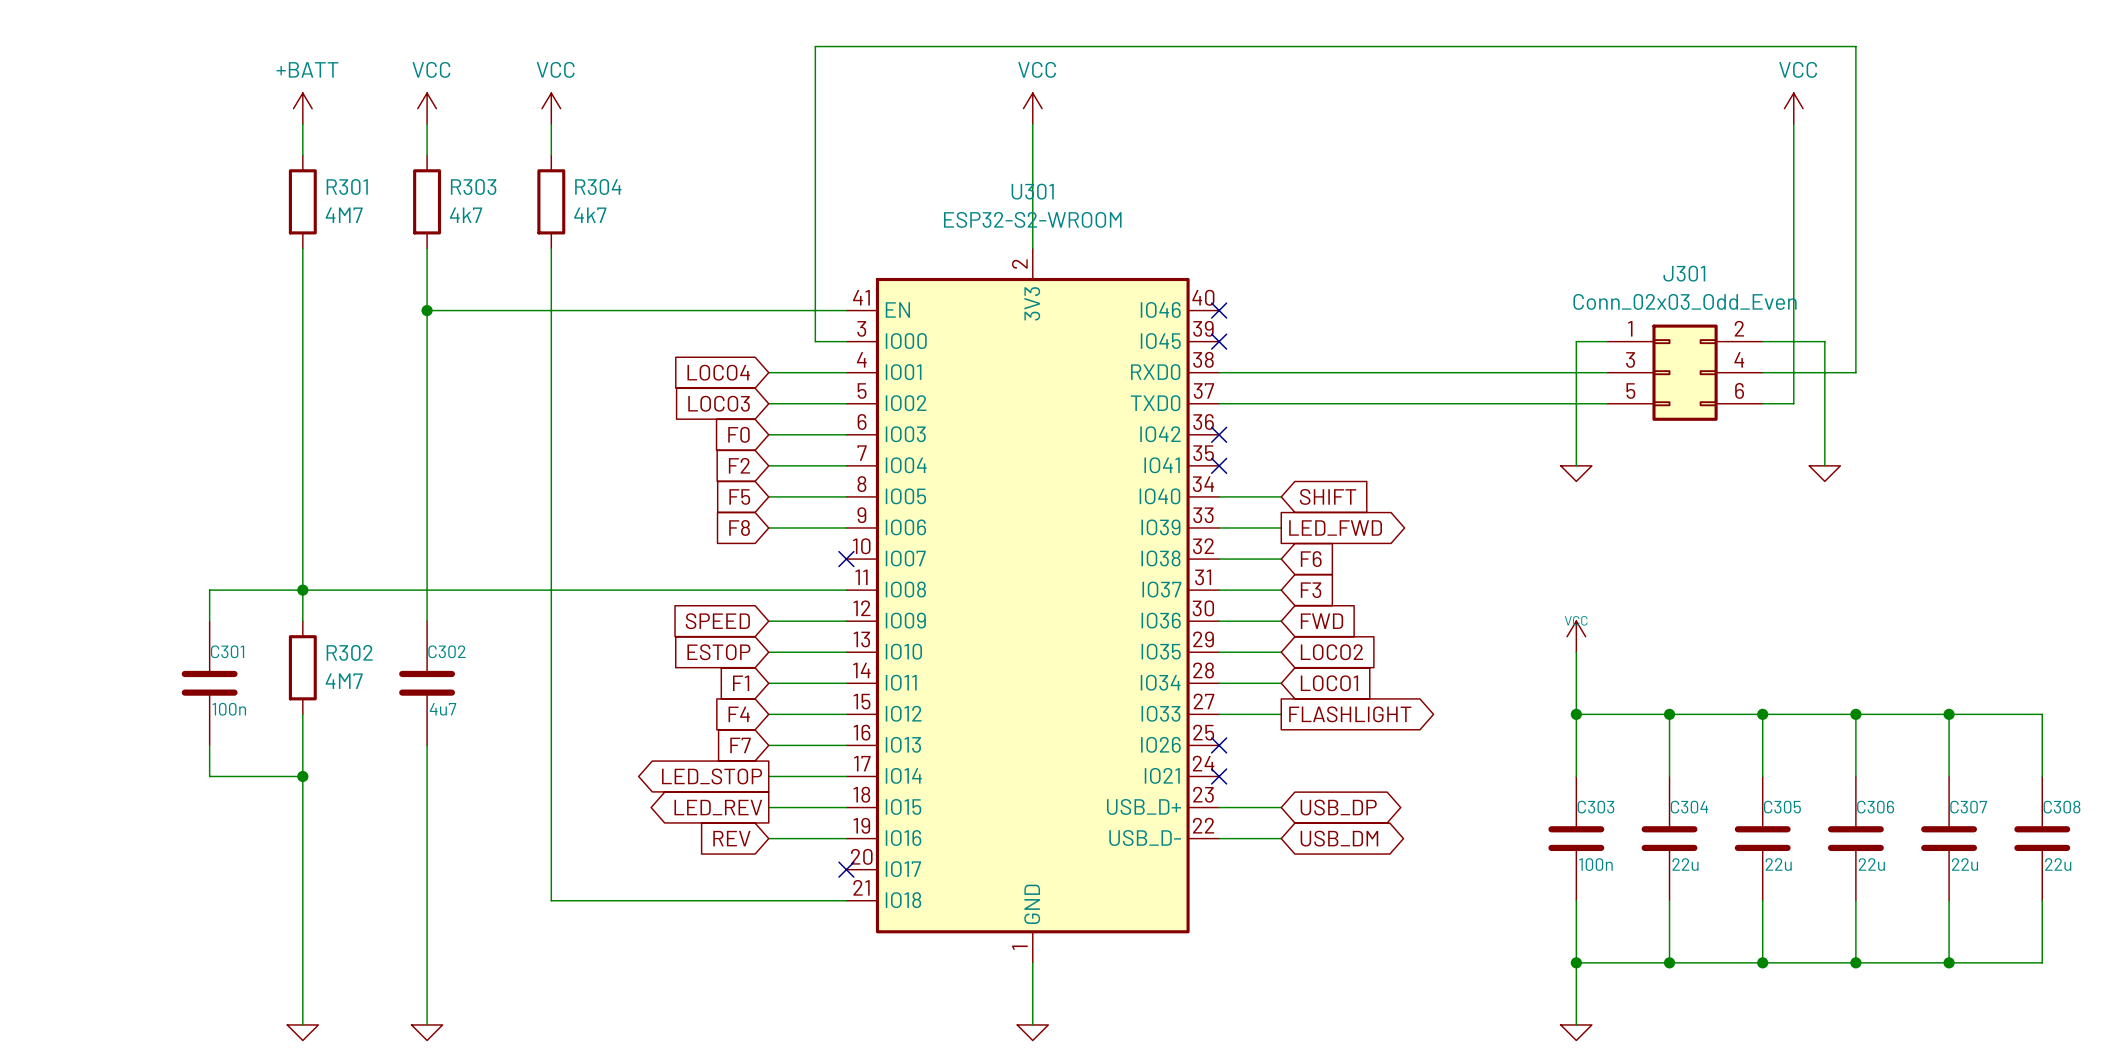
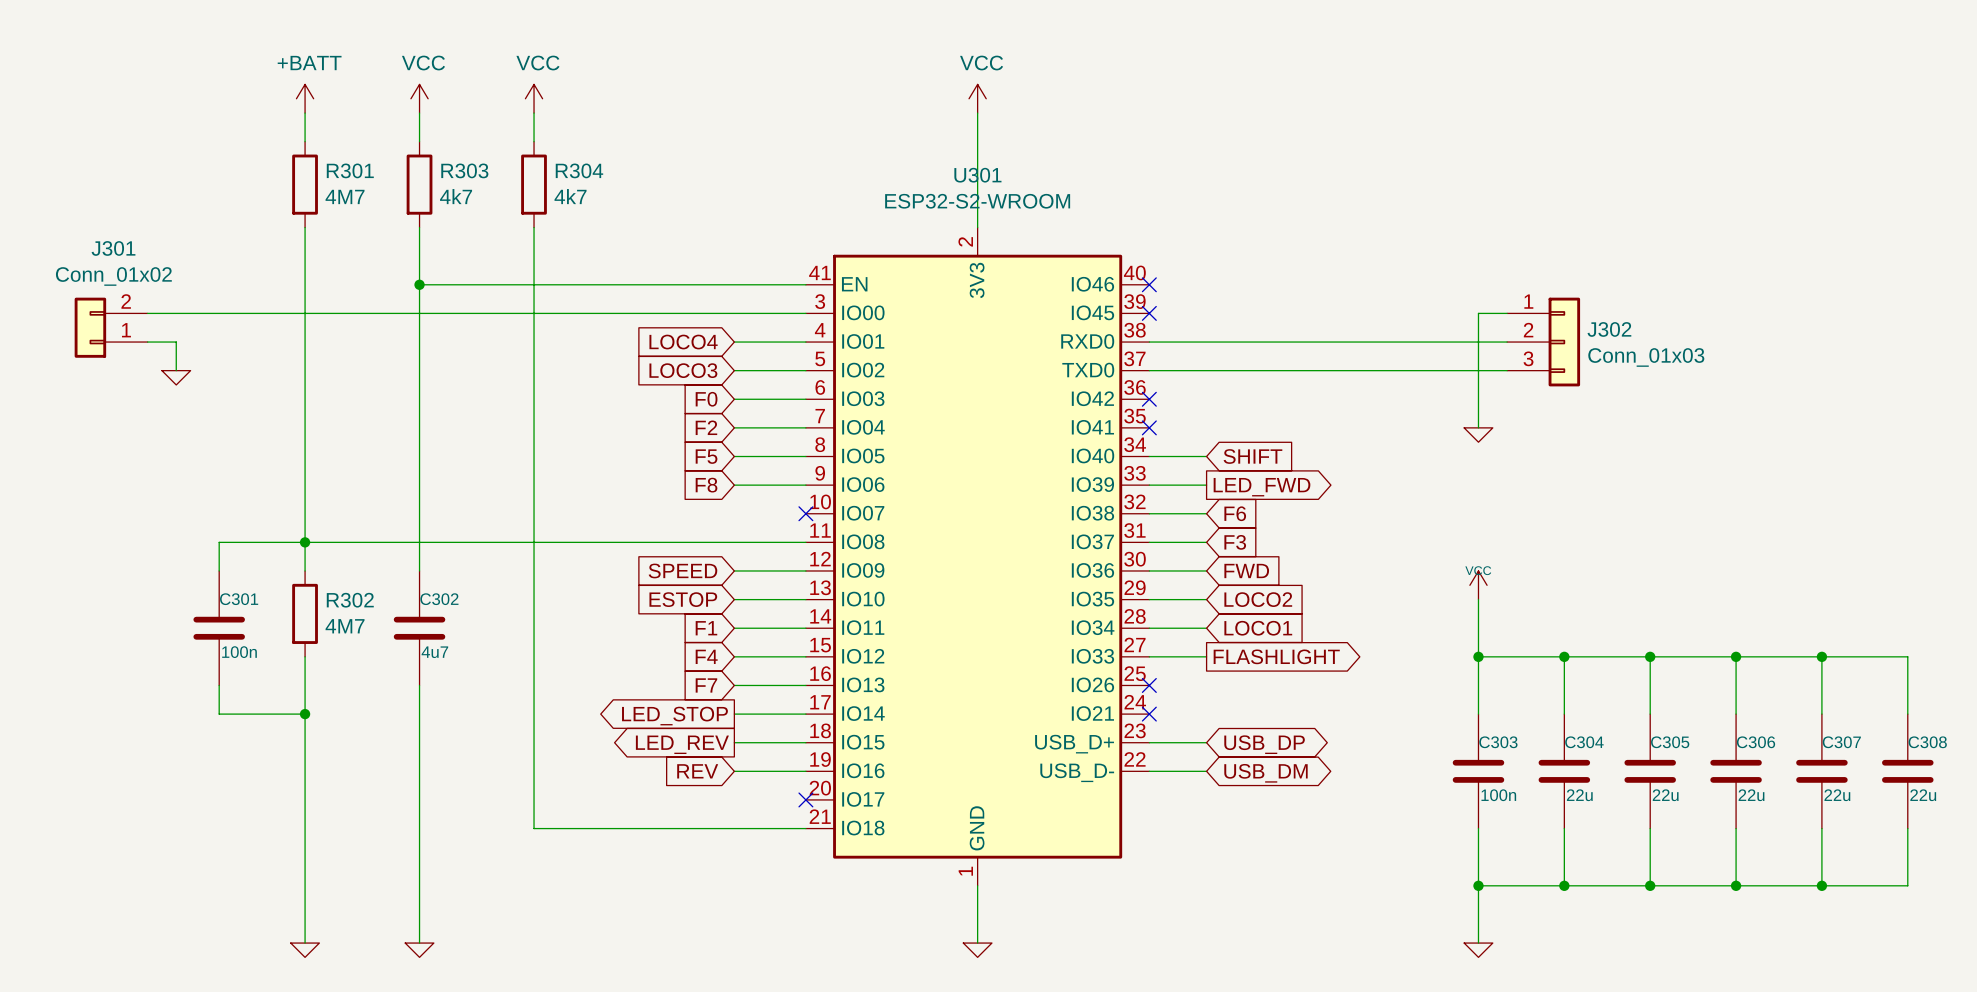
power symbol: VCC (1793, 108) -> none
wire: (1793, 124) (1793, 403) (1762, 403) -> none
J301 value: Conn_02x03_Odd_Even (1685, 301) -> Conn_01x02 (113, 276)
J301 symbol: [1607, 324, 1763, 421] -> [74, 297, 148, 358]
wire: (815, 341) (815, 46) (1855, 46) (1855, 372) (1762, 372) -> (777, 313) (147, 313)
wire: (1762, 341) (1824, 341) (1824, 465) -> none
wire: none -> (147, 342) (176, 342) (176, 370)
J302: none -> Conn_01x03 (1543, 342)
power symbol: none -> (176, 377)
power symbol: (1824, 473) -> none

